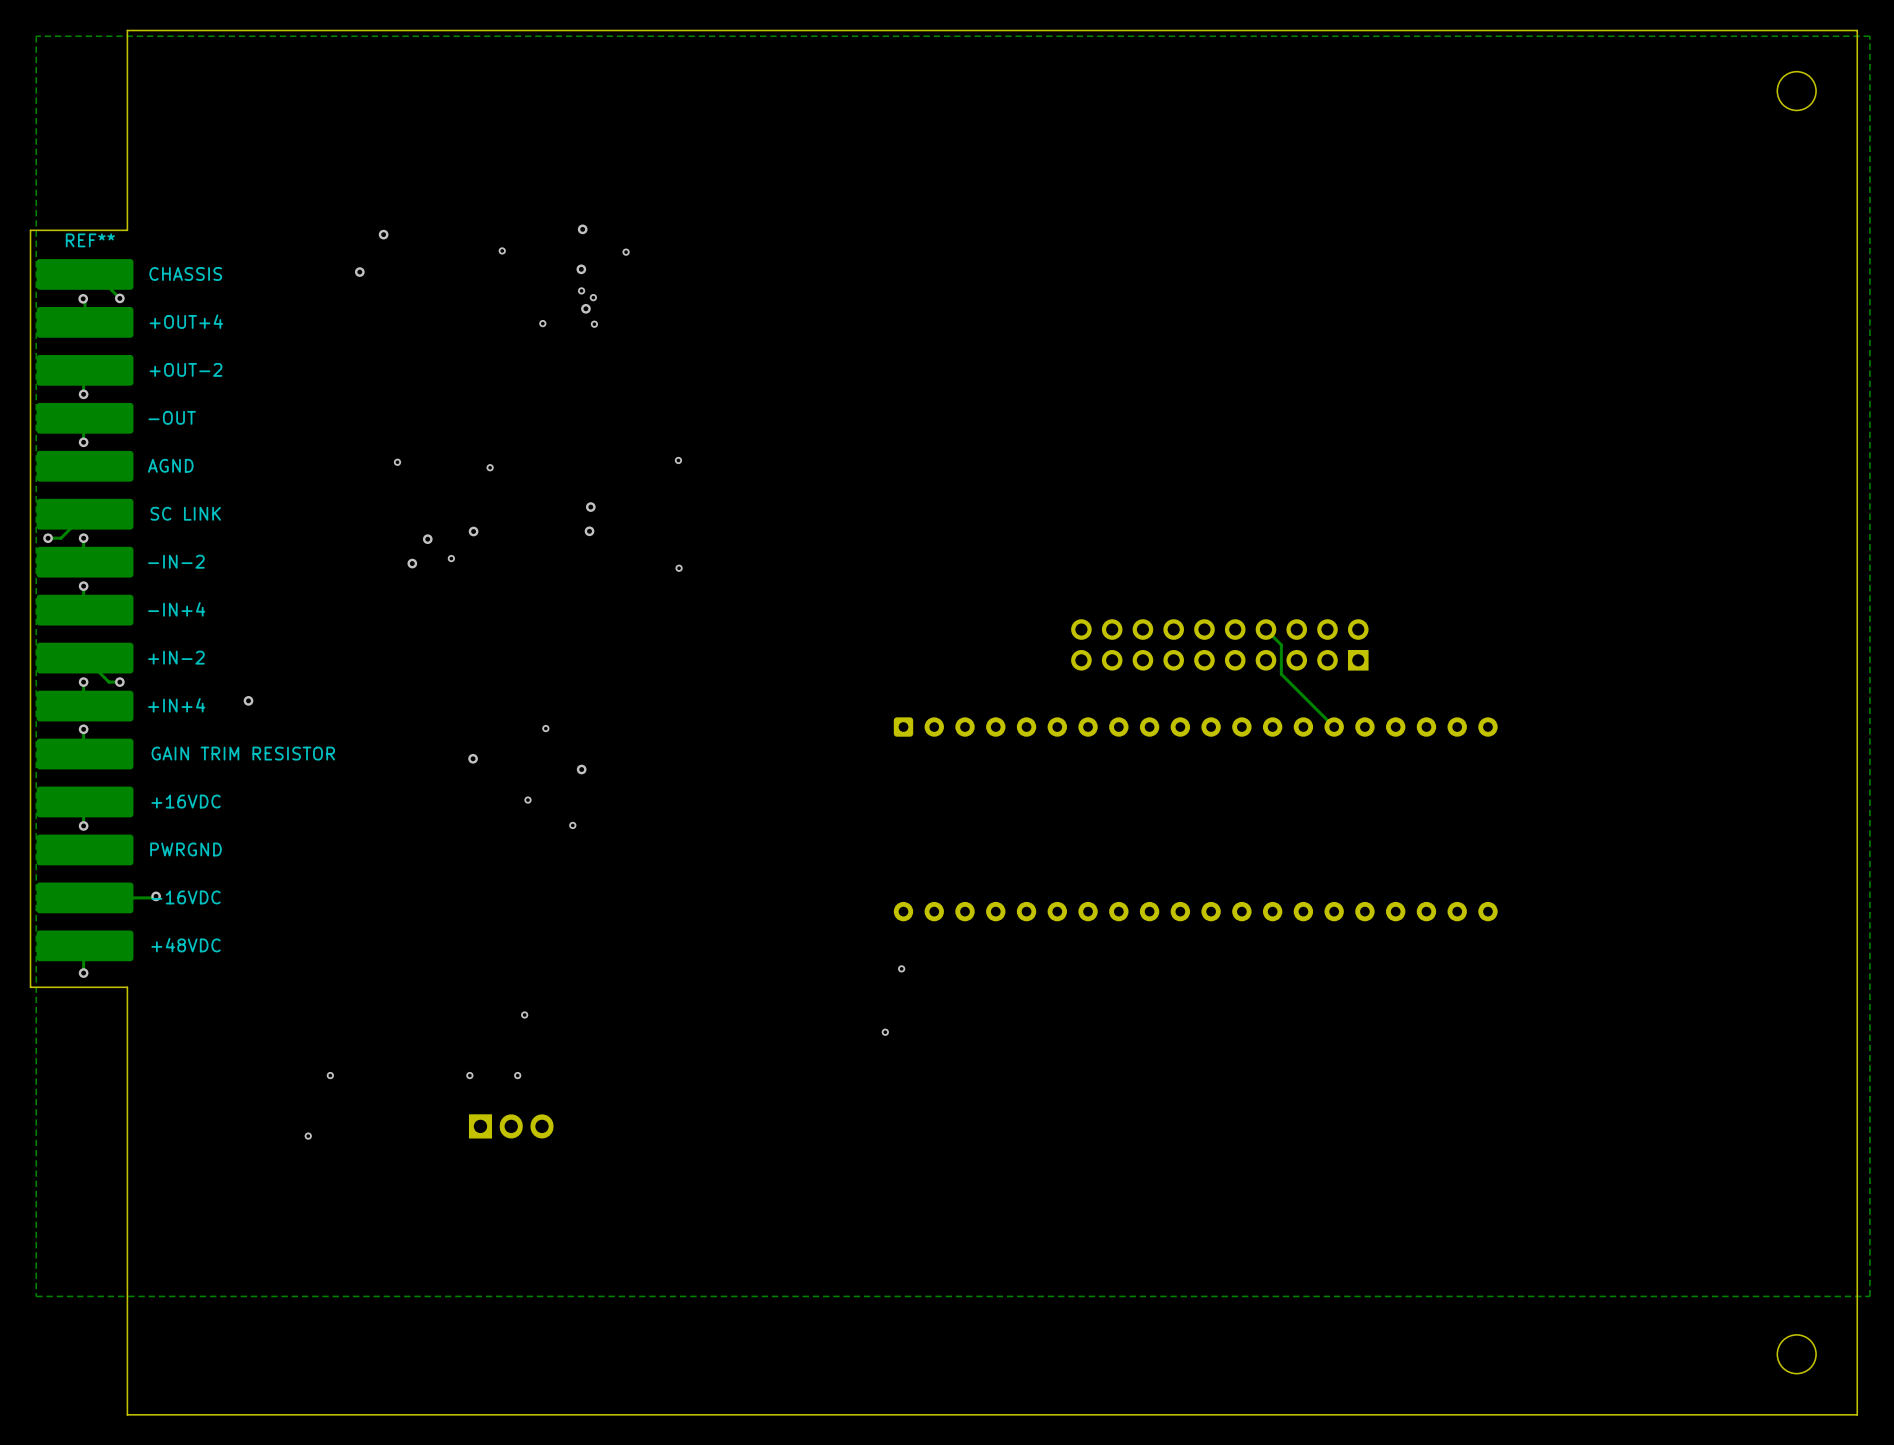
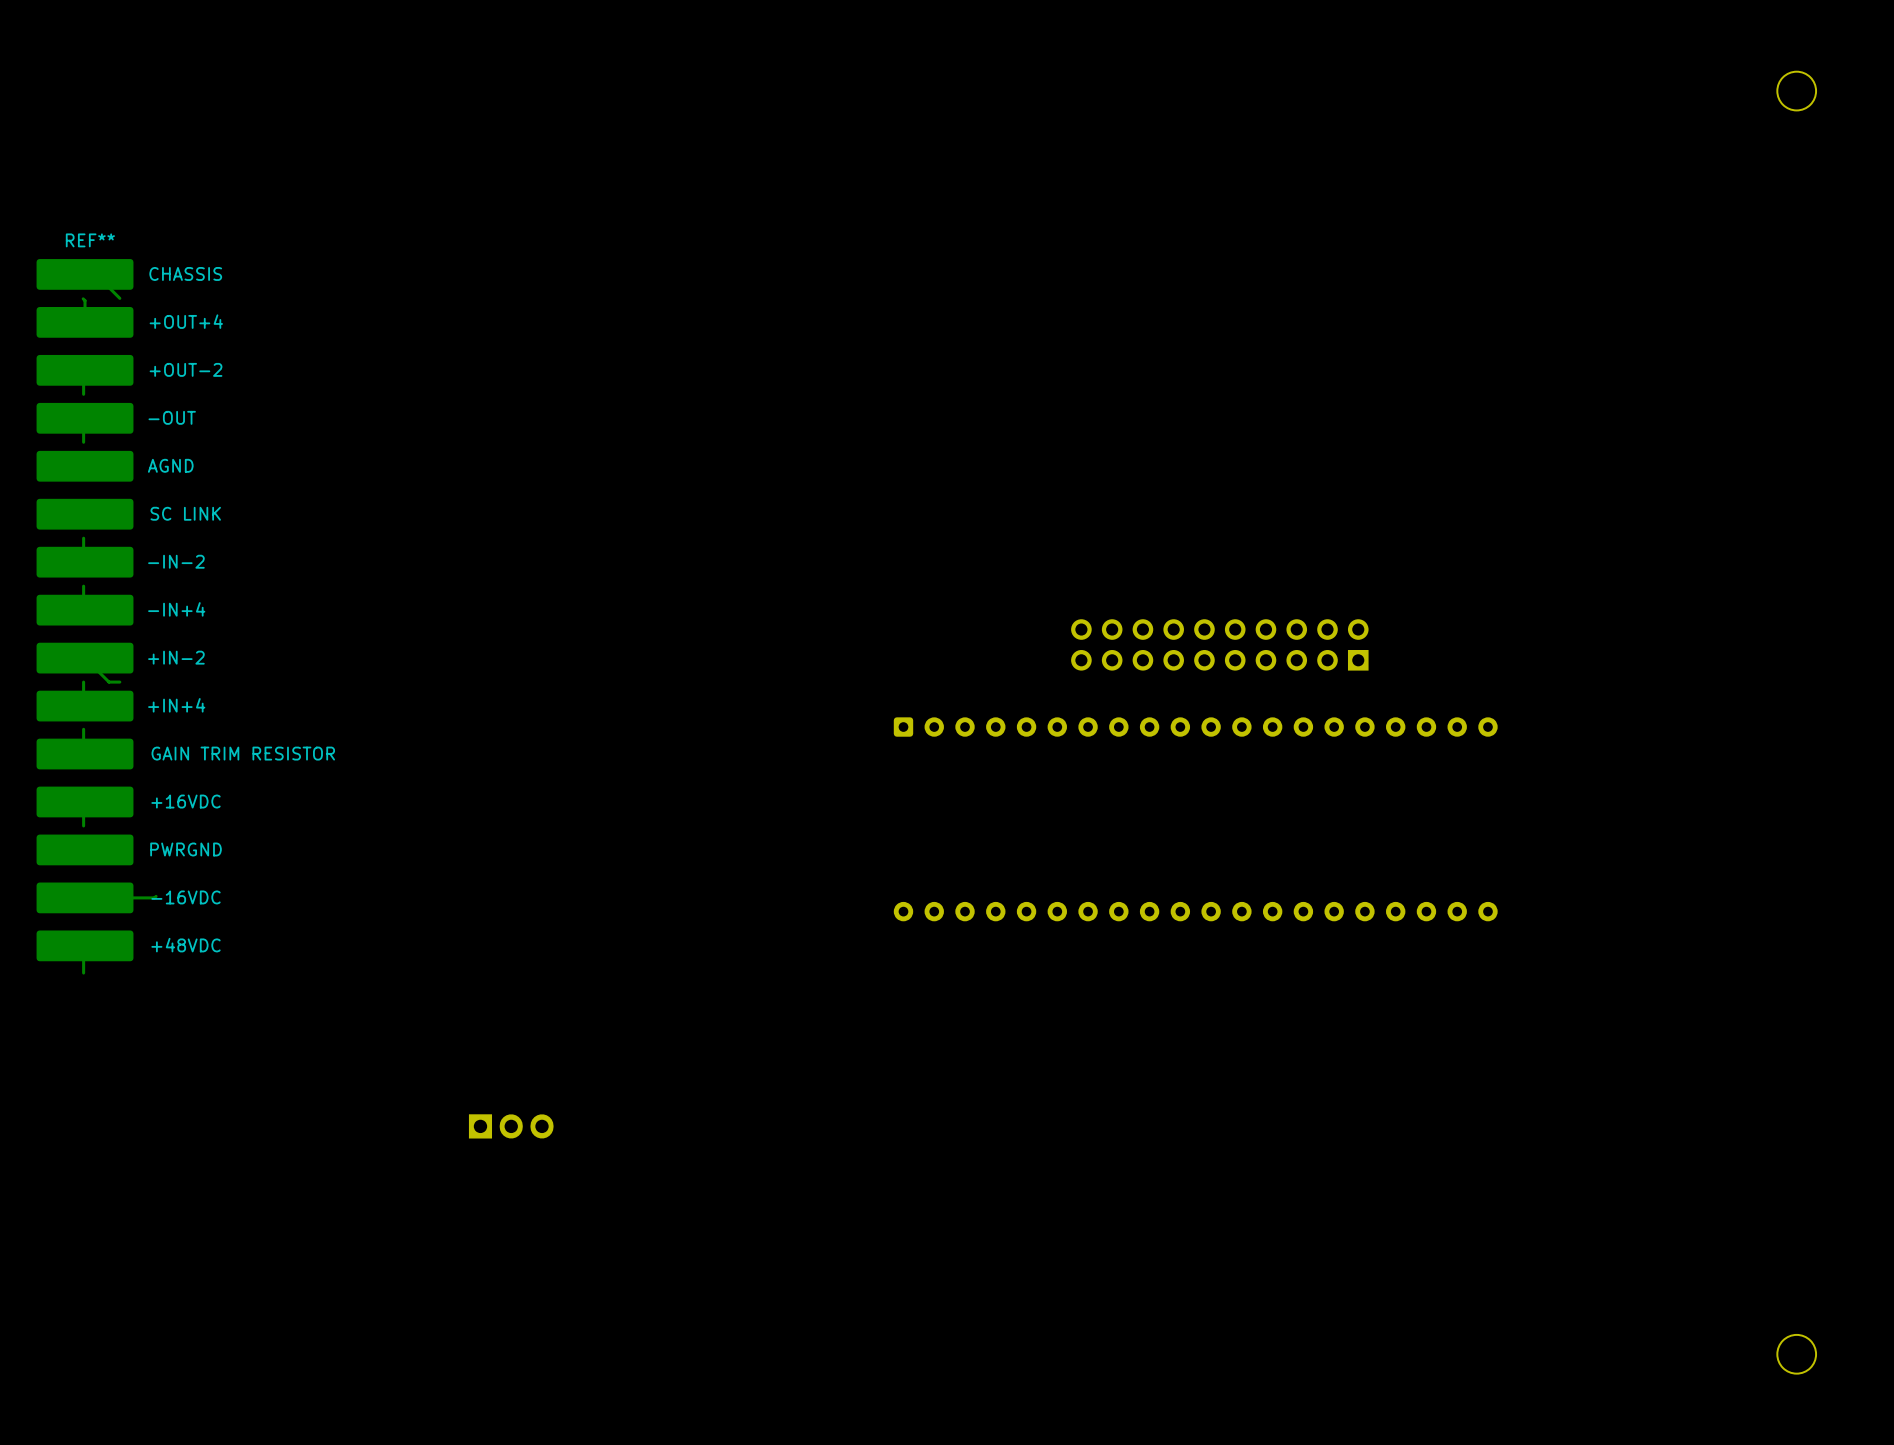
board edge: (1857, 30) (127, 30) (127, 230) (30, 230) (30, 987) (127, 987) (127, 1414) (1857, 1414) (1857, 30) -> none
zone outline: (1869, 36) (36, 36) (36, 1296) (1869, 1296) (1869, 36) -> none
via: (582, 229) -> none
via: (383, 234) -> none
via: (502, 250) -> none
via: (626, 252) -> none
via: (581, 269) -> none
via: (359, 272) -> none
via: (581, 290) -> none
via: (593, 297) -> none
via: (83, 298) -> none
via: (119, 298) -> none
via: (585, 308) -> none
via: (542, 323) -> none
via: (594, 324) -> none
via: (83, 394) -> none
via: (83, 442) -> none
via: (678, 460) -> none
via: (397, 462) -> none
via: (490, 467) -> none
via: (590, 507) -> none
track: (85, 514) (61, 538) (48, 538) -> none
via: (473, 531) -> none
via: (589, 531) -> none
via: (48, 538) -> none
via: (83, 538) -> none
via: (427, 539) -> none
via: (451, 558) -> none
via: (412, 563) -> none
via: (679, 568) -> none
via: (83, 586) -> none
track: (1265, 629) (1281, 644) (1281, 674) (1334, 727) -> none
via: (83, 682) -> none
via: (119, 682) -> none
via: (248, 700) -> none
via: (545, 728) -> none
via: (83, 729) -> none
via: (473, 758) -> none
via: (581, 769) -> none
via: (527, 800) -> none
via: (83, 825) -> none
via: (572, 825) -> none
via: (156, 896) -> none
via: (901, 968) -> none
via: (83, 973) -> none
via: (524, 1014) -> none
via: (885, 1032) -> none
via: (330, 1075) -> none
via: (469, 1075) -> none
via: (517, 1075) -> none
via: (308, 1136) -> none

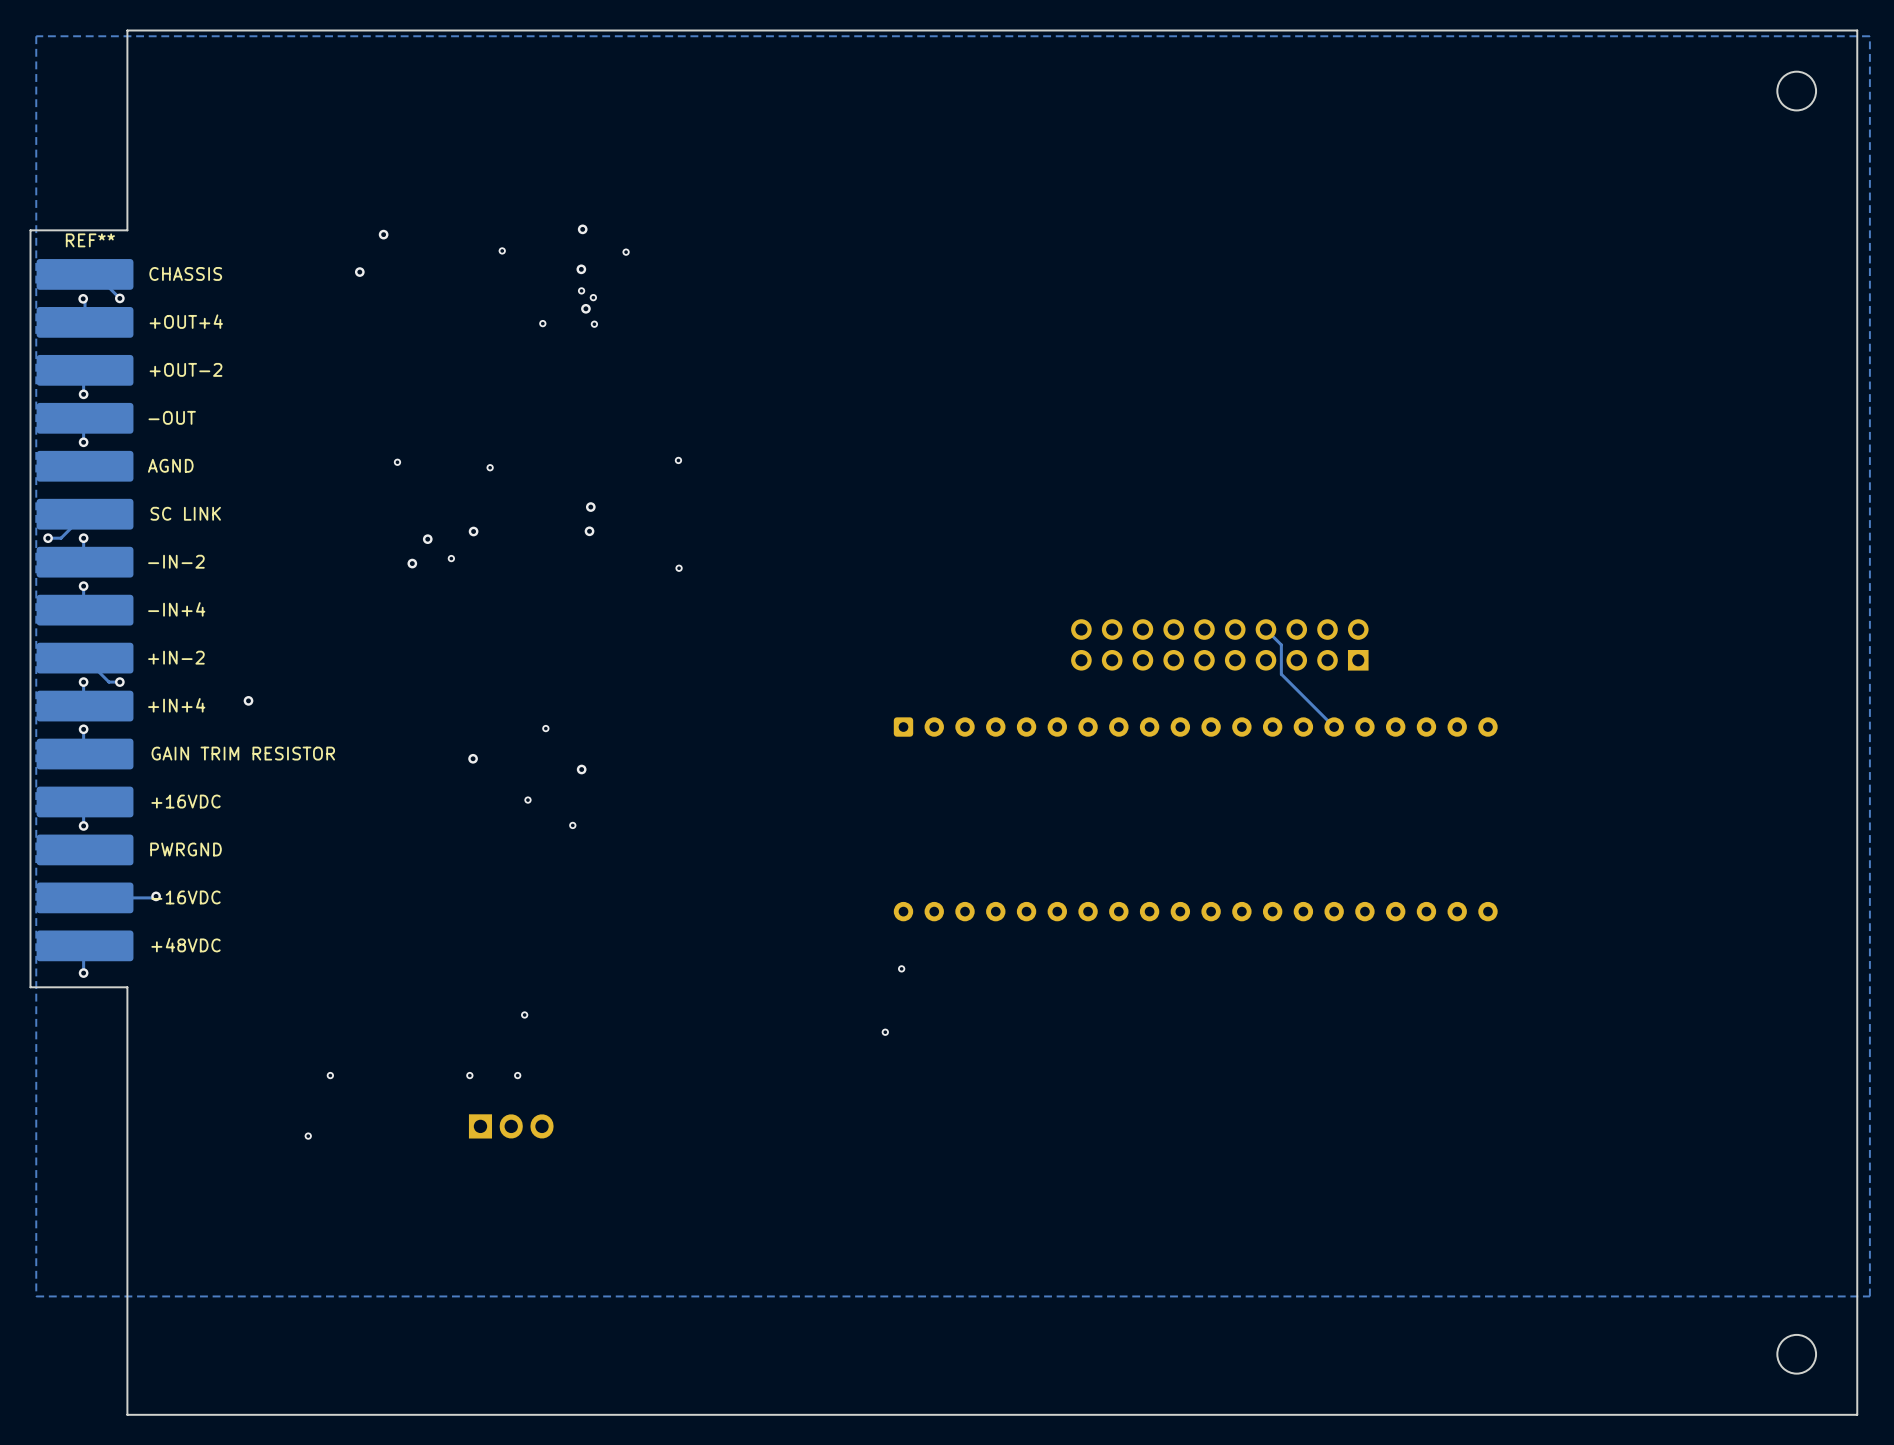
board edge: none -> (1857, 30) (127, 30) (127, 230) (30, 230) (30, 987) (127, 987) (127, 1414) (1857, 1414) (1857, 30)
zone outline: none -> (1869, 36) (36, 36) (36, 1296) (1869, 1296) (1869, 36)
via: none -> (582, 229)
via: none -> (383, 234)
via: none -> (502, 250)
via: none -> (626, 252)
via: none -> (581, 269)
via: none -> (359, 272)
via: none -> (581, 290)
via: none -> (593, 297)
via: none -> (83, 298)
via: none -> (119, 298)
via: none -> (585, 308)
via: none -> (542, 323)
via: none -> (594, 324)
via: none -> (83, 394)
via: none -> (83, 442)
via: none -> (678, 460)
via: none -> (397, 462)
via: none -> (490, 467)
via: none -> (590, 507)
track: none -> (85, 514) (61, 538) (48, 538)
via: none -> (473, 531)
via: none -> (589, 531)
via: none -> (48, 538)
via: none -> (83, 538)
via: none -> (427, 539)
via: none -> (451, 558)
via: none -> (412, 563)
via: none -> (679, 568)
via: none -> (83, 586)
track: none -> (1265, 629) (1281, 644) (1281, 674) (1334, 727)
via: none -> (83, 682)
via: none -> (119, 682)
via: none -> (248, 700)
via: none -> (545, 728)
via: none -> (83, 729)
via: none -> (473, 758)
via: none -> (581, 769)
via: none -> (527, 800)
via: none -> (83, 825)
via: none -> (572, 825)
via: none -> (156, 896)
via: none -> (901, 968)
via: none -> (83, 973)
via: none -> (524, 1014)
via: none -> (885, 1032)
via: none -> (330, 1075)
via: none -> (469, 1075)
via: none -> (517, 1075)
via: none -> (308, 1136)

